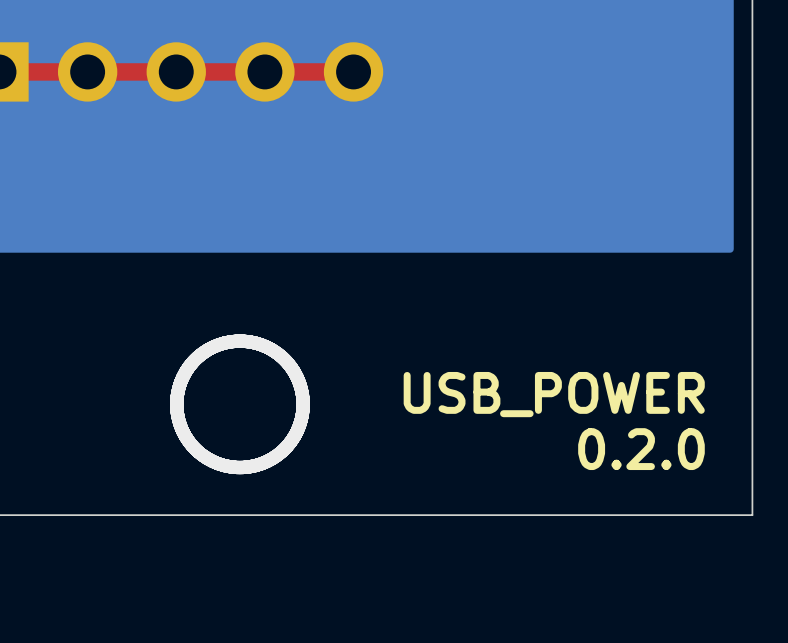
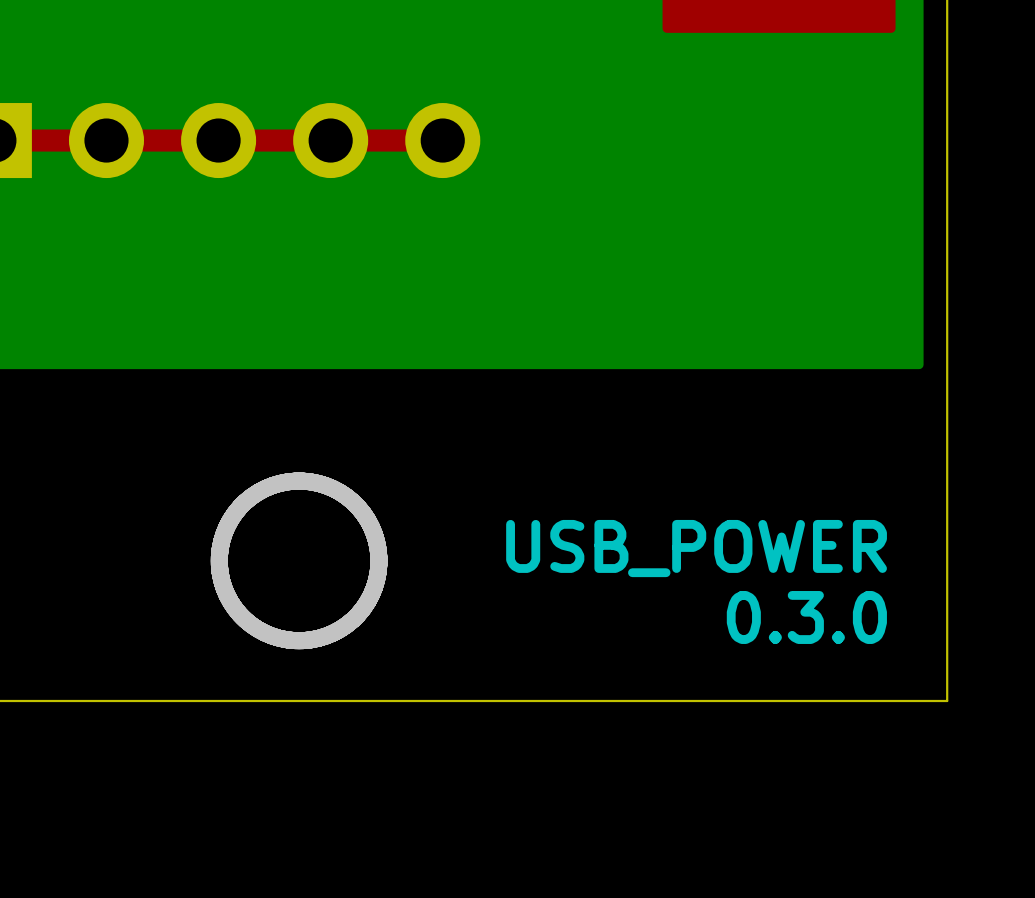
text: 0.2.0 (641, 449) -> 0.3.0 (806, 617)

